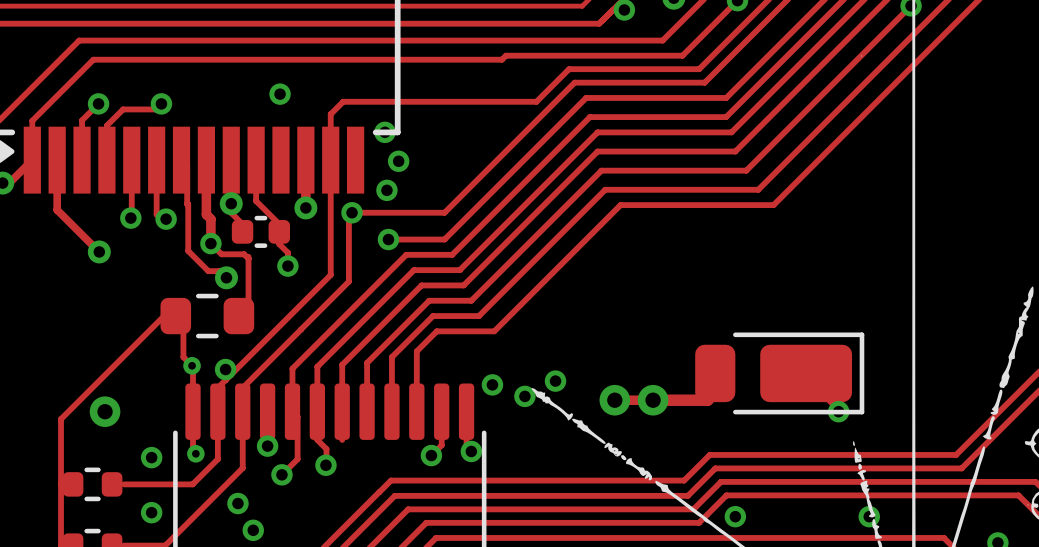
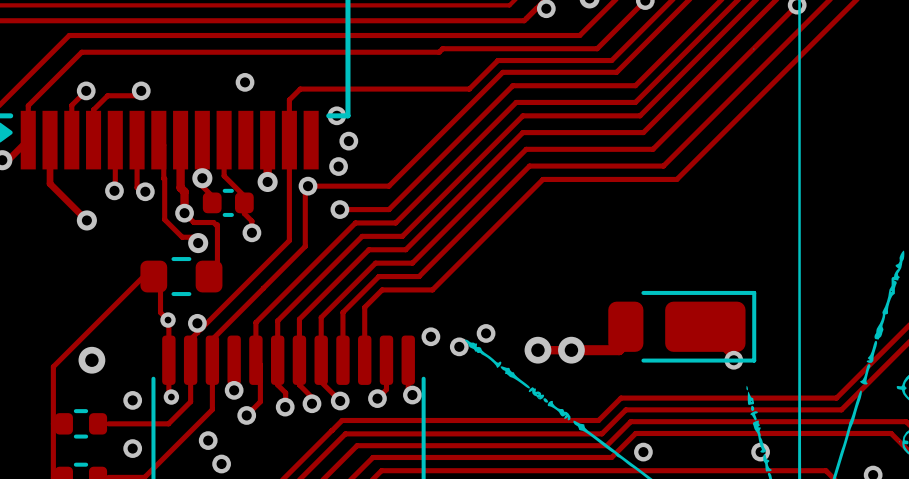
track: none -> (321, 381) (340, 400)
track: none -> (299, 384) (311, 396) (311, 403)
via: none -> (340, 400)
via: none -> (311, 403)

